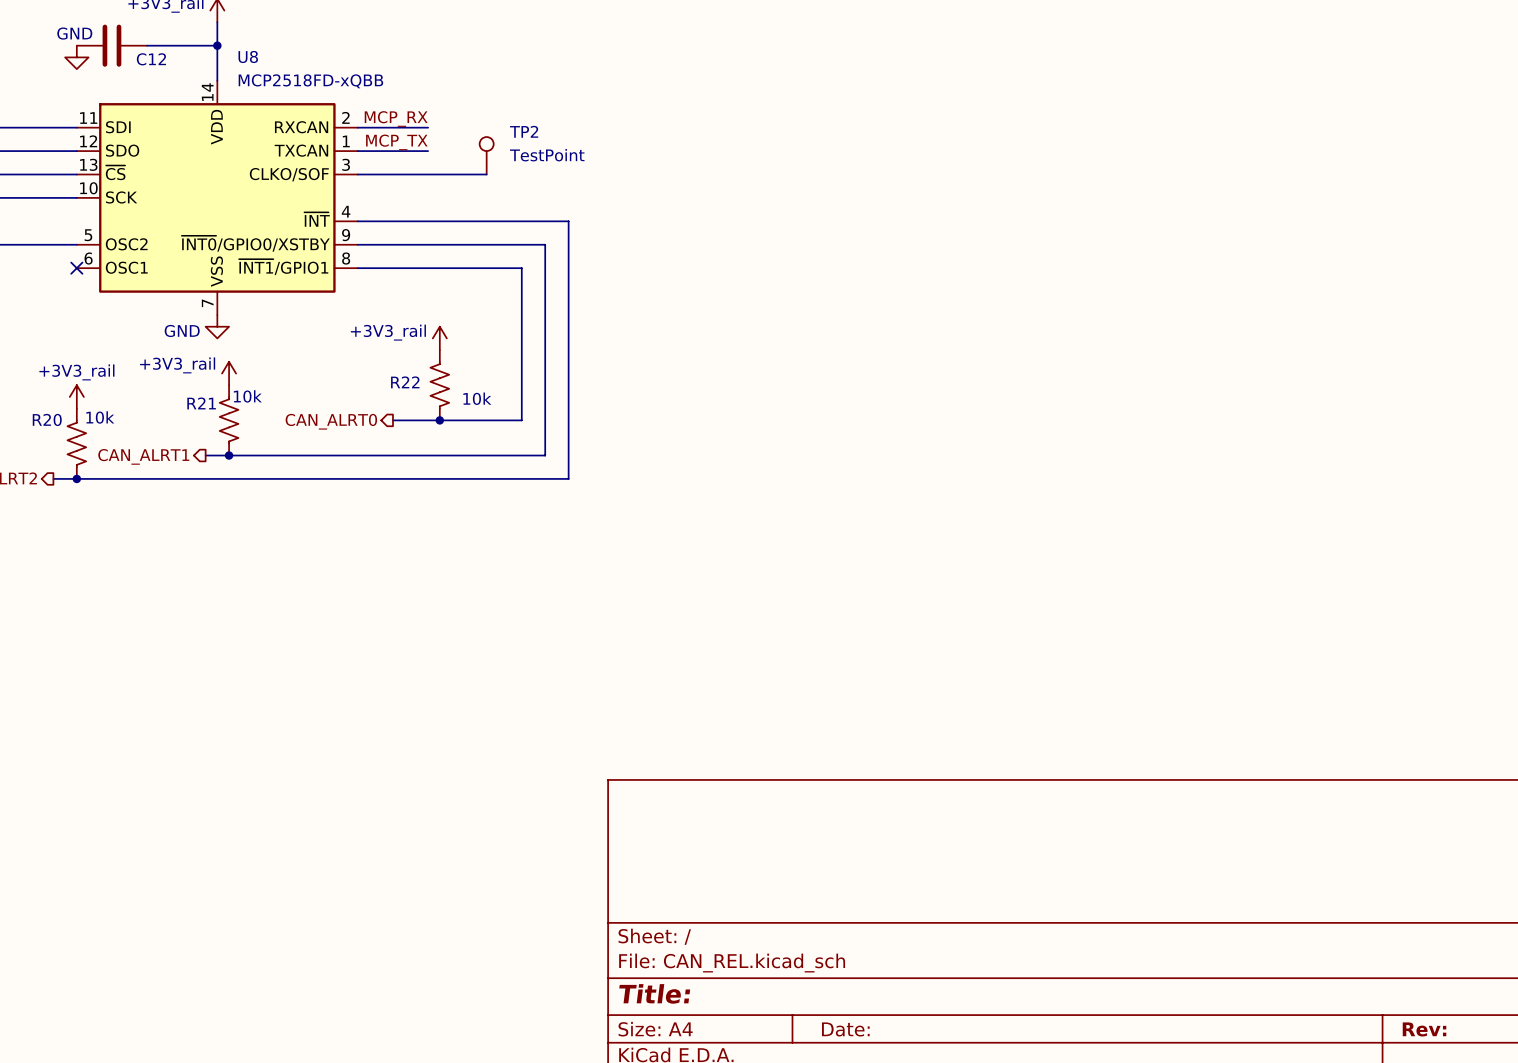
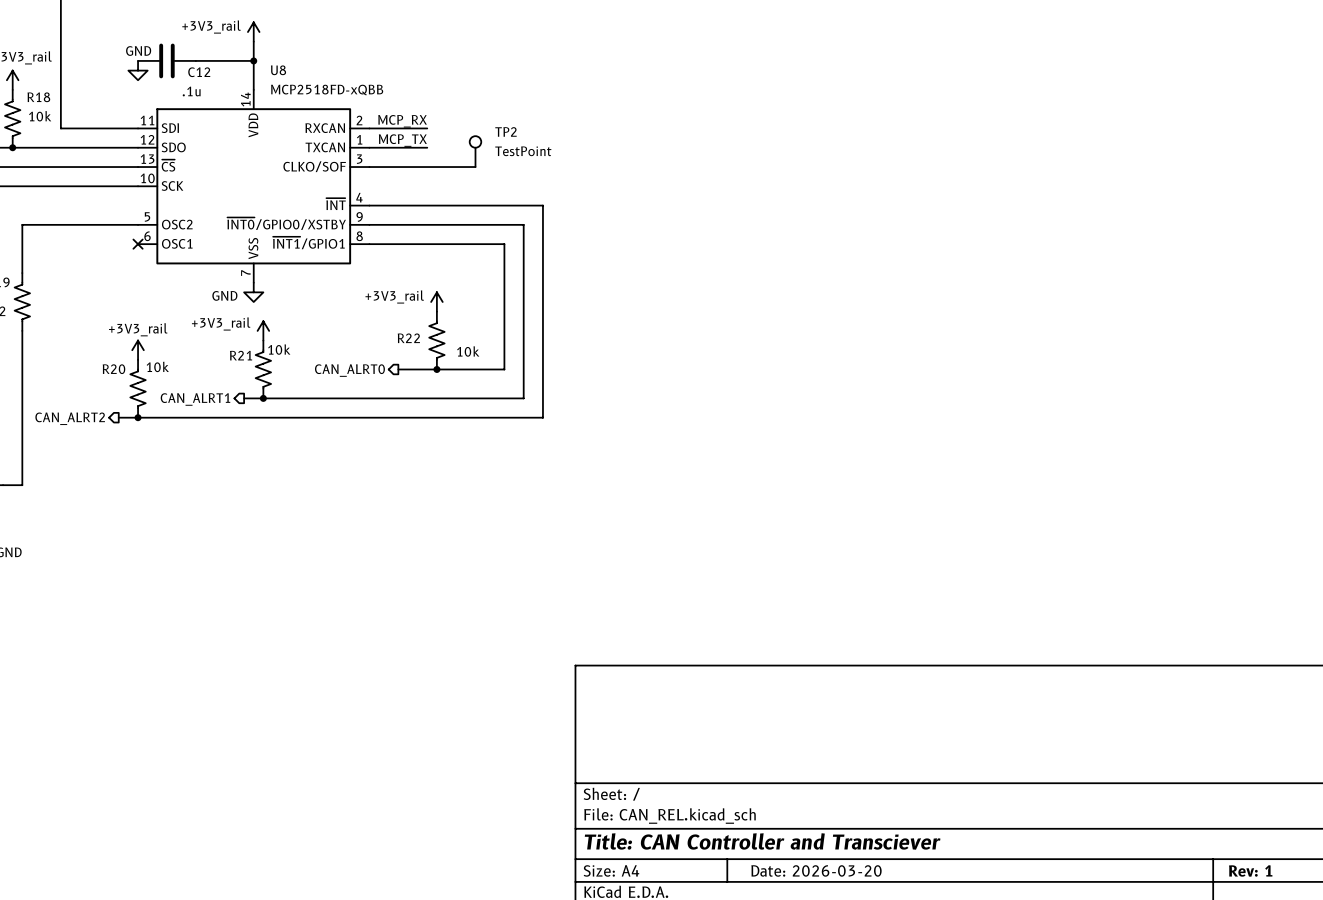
C12 value: none -> .1u (191, 91)
title block: Title: (654, 993) -> Title: CAN Controller and Transciever (762, 841)
title block: Date: (845, 1029) -> Date: 2026-03-20 (816, 870)
title block: Rev: (1424, 1029) -> Rev: 1 (1250, 870)

